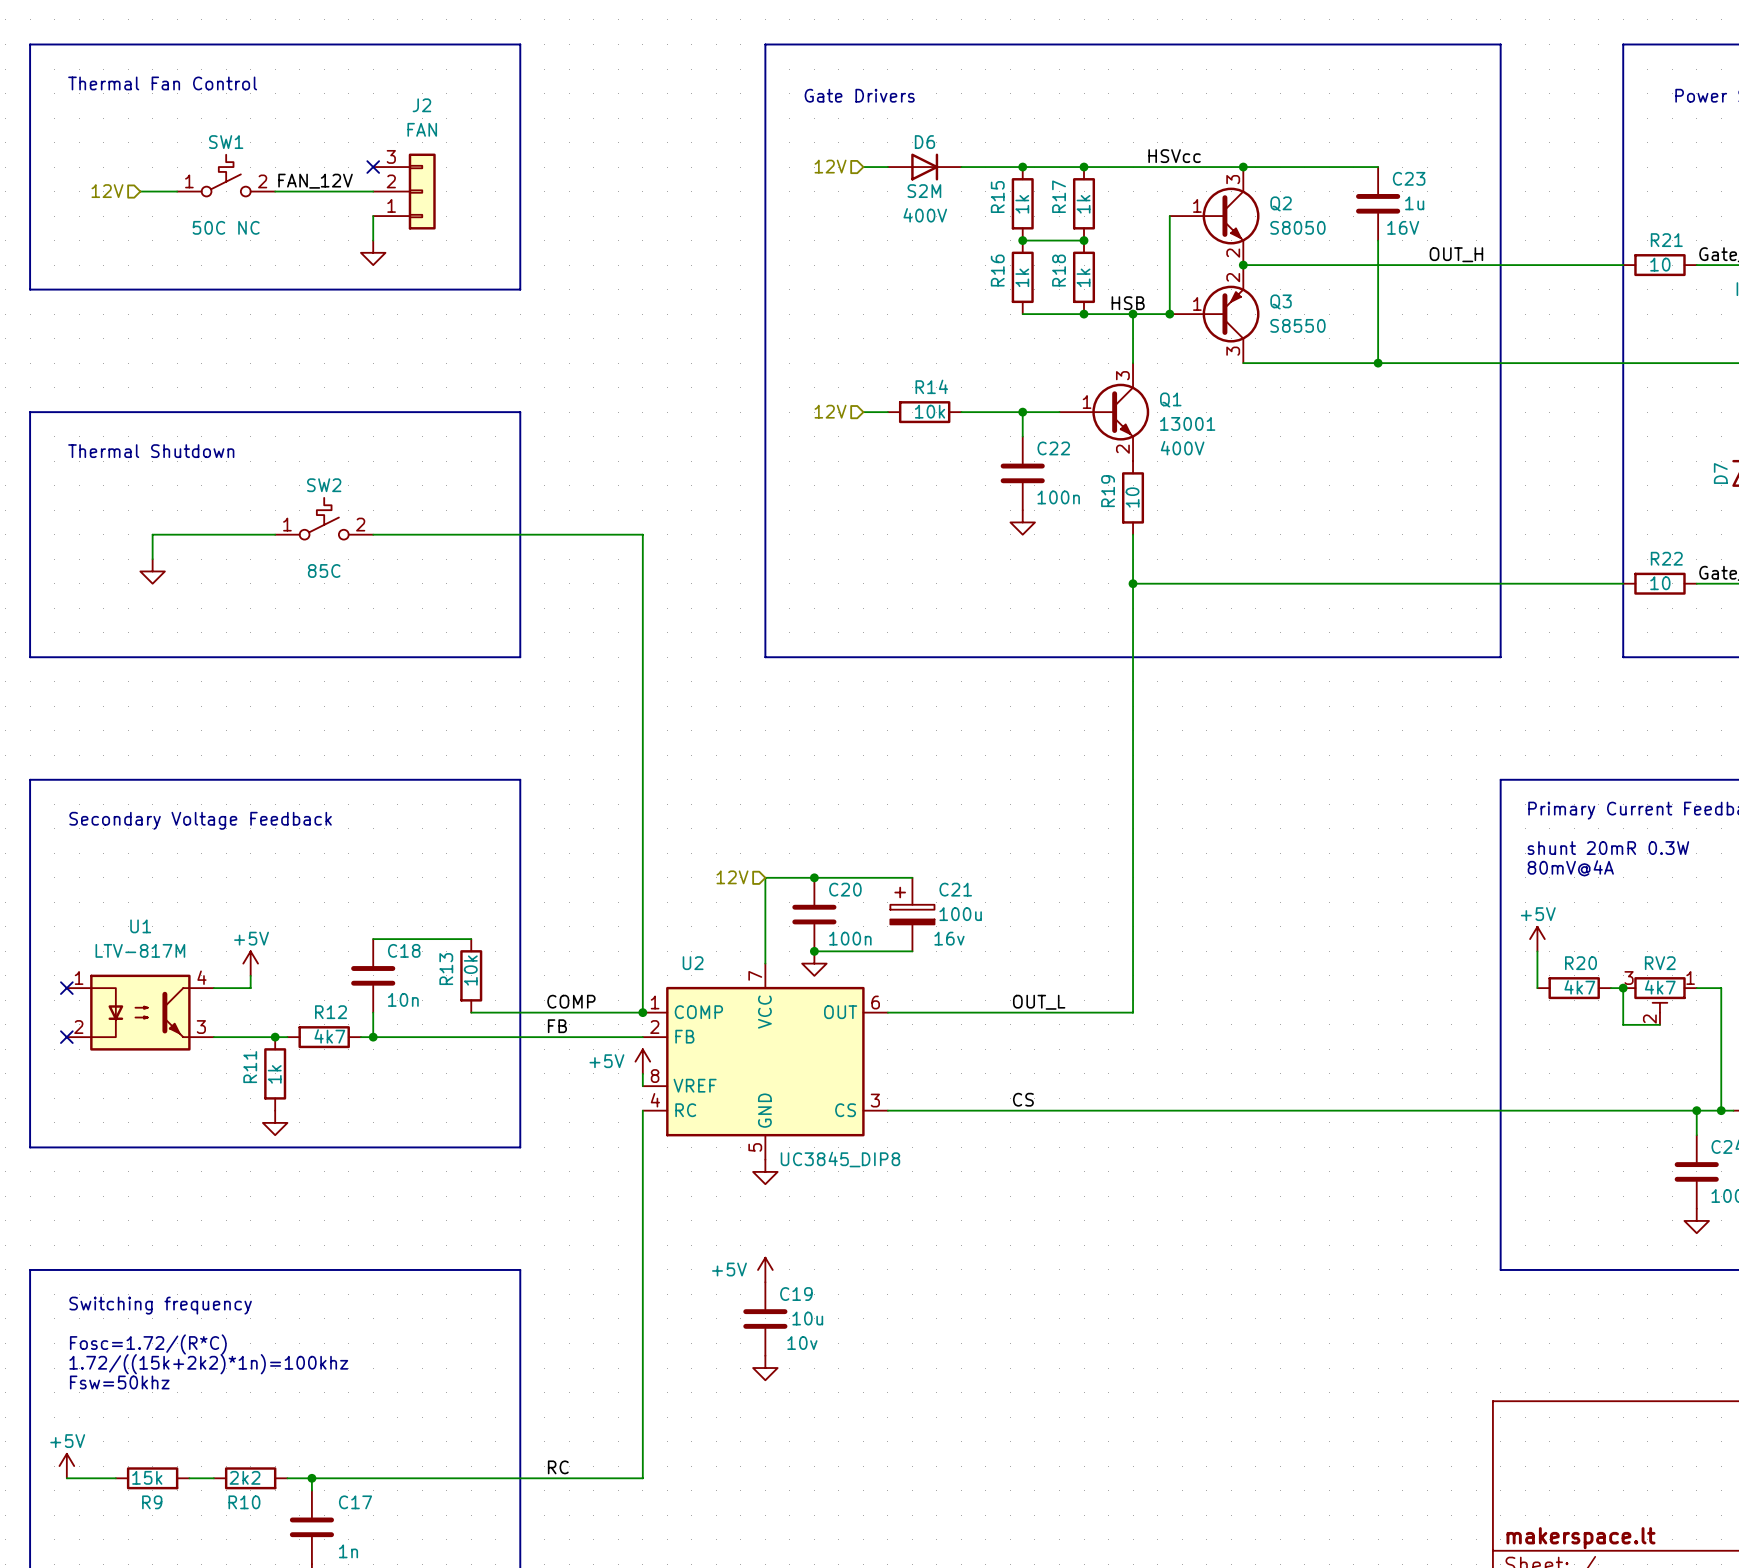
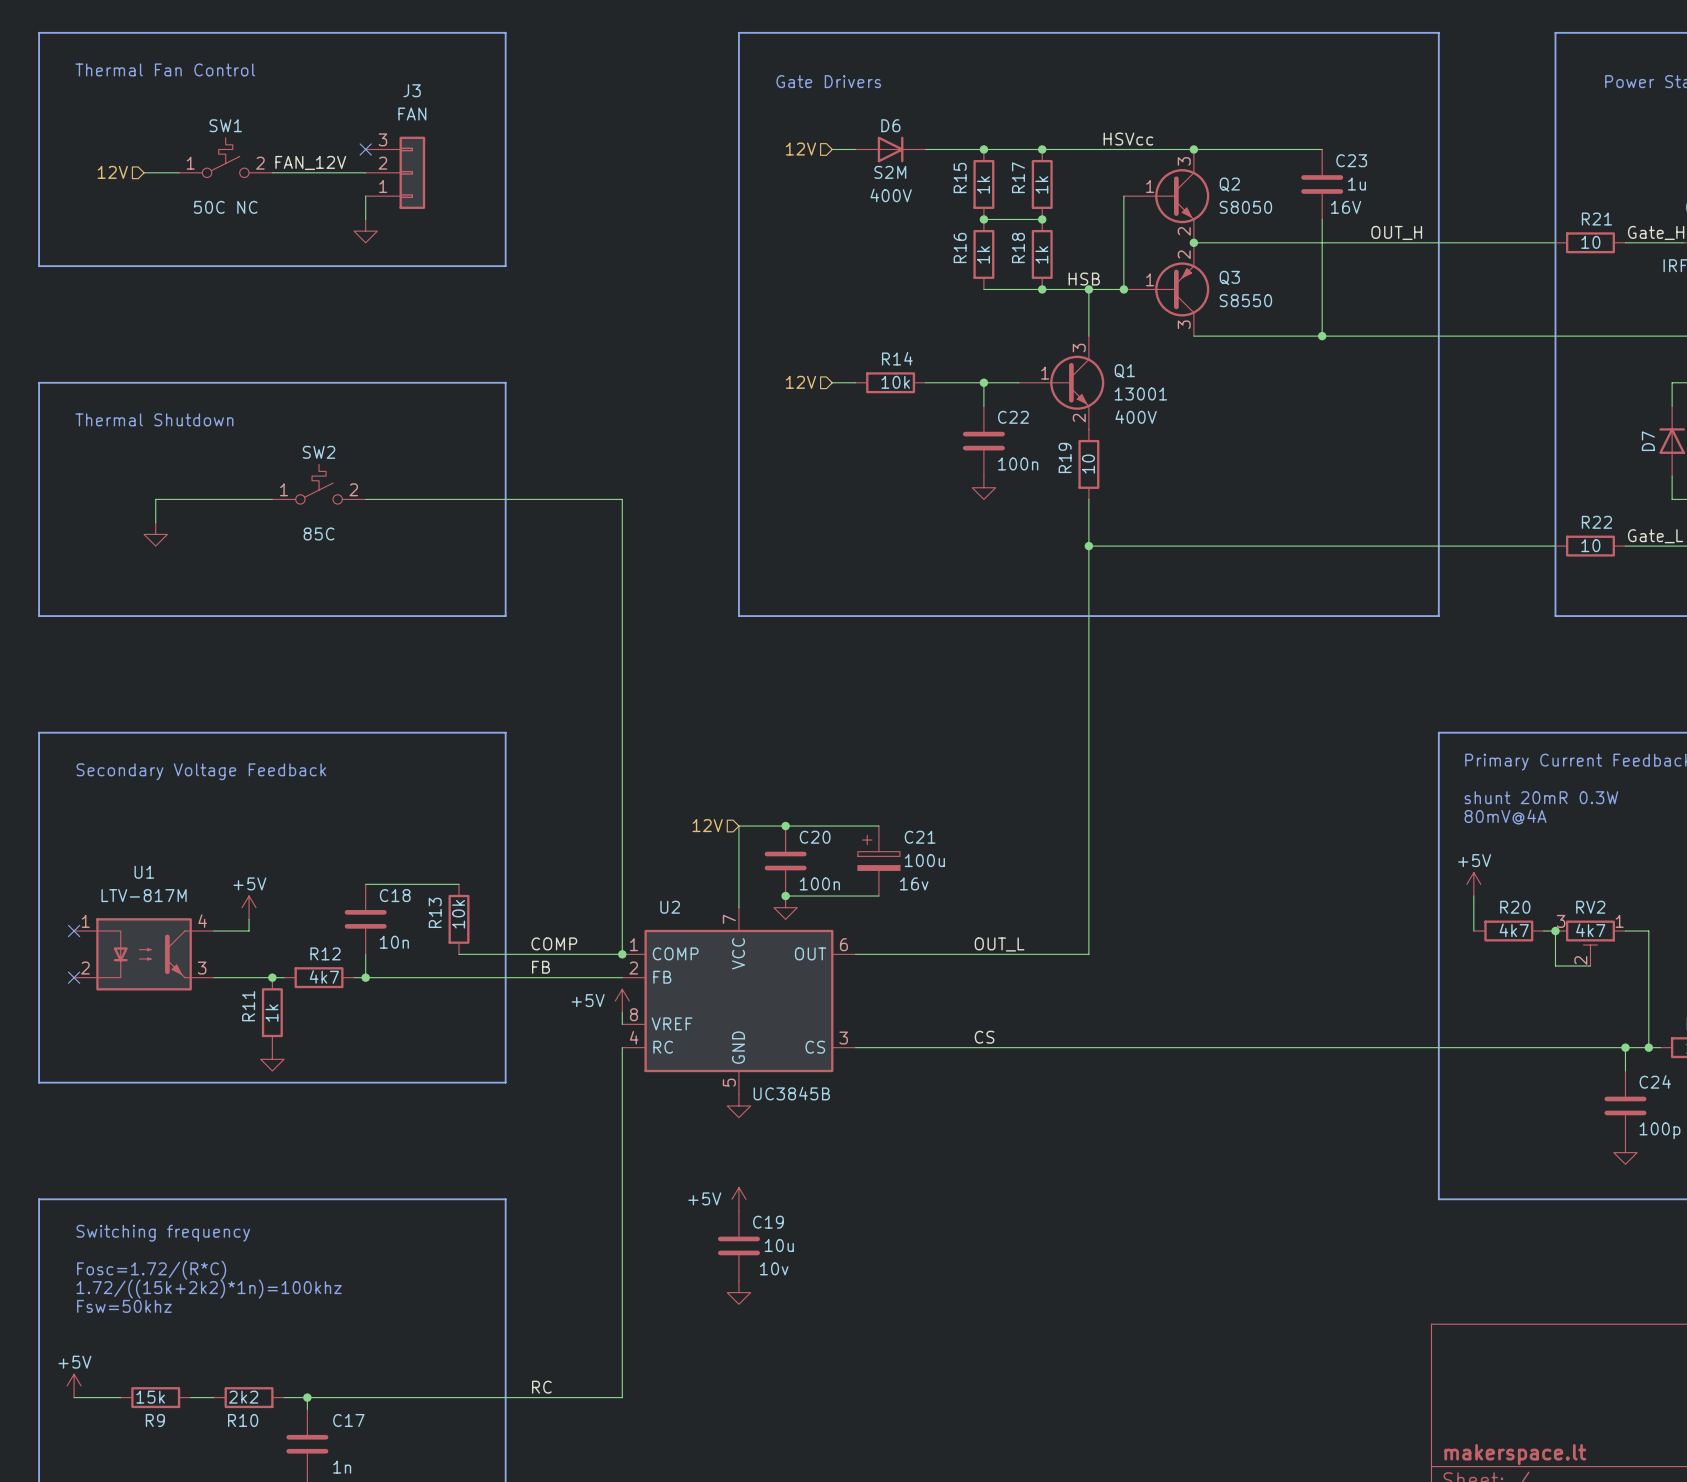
J2 name: J2 (421, 105) -> J3 (412, 90)
U2 value: UC3845_DIP8 (840, 1159) -> UC3845B (791, 1093)

